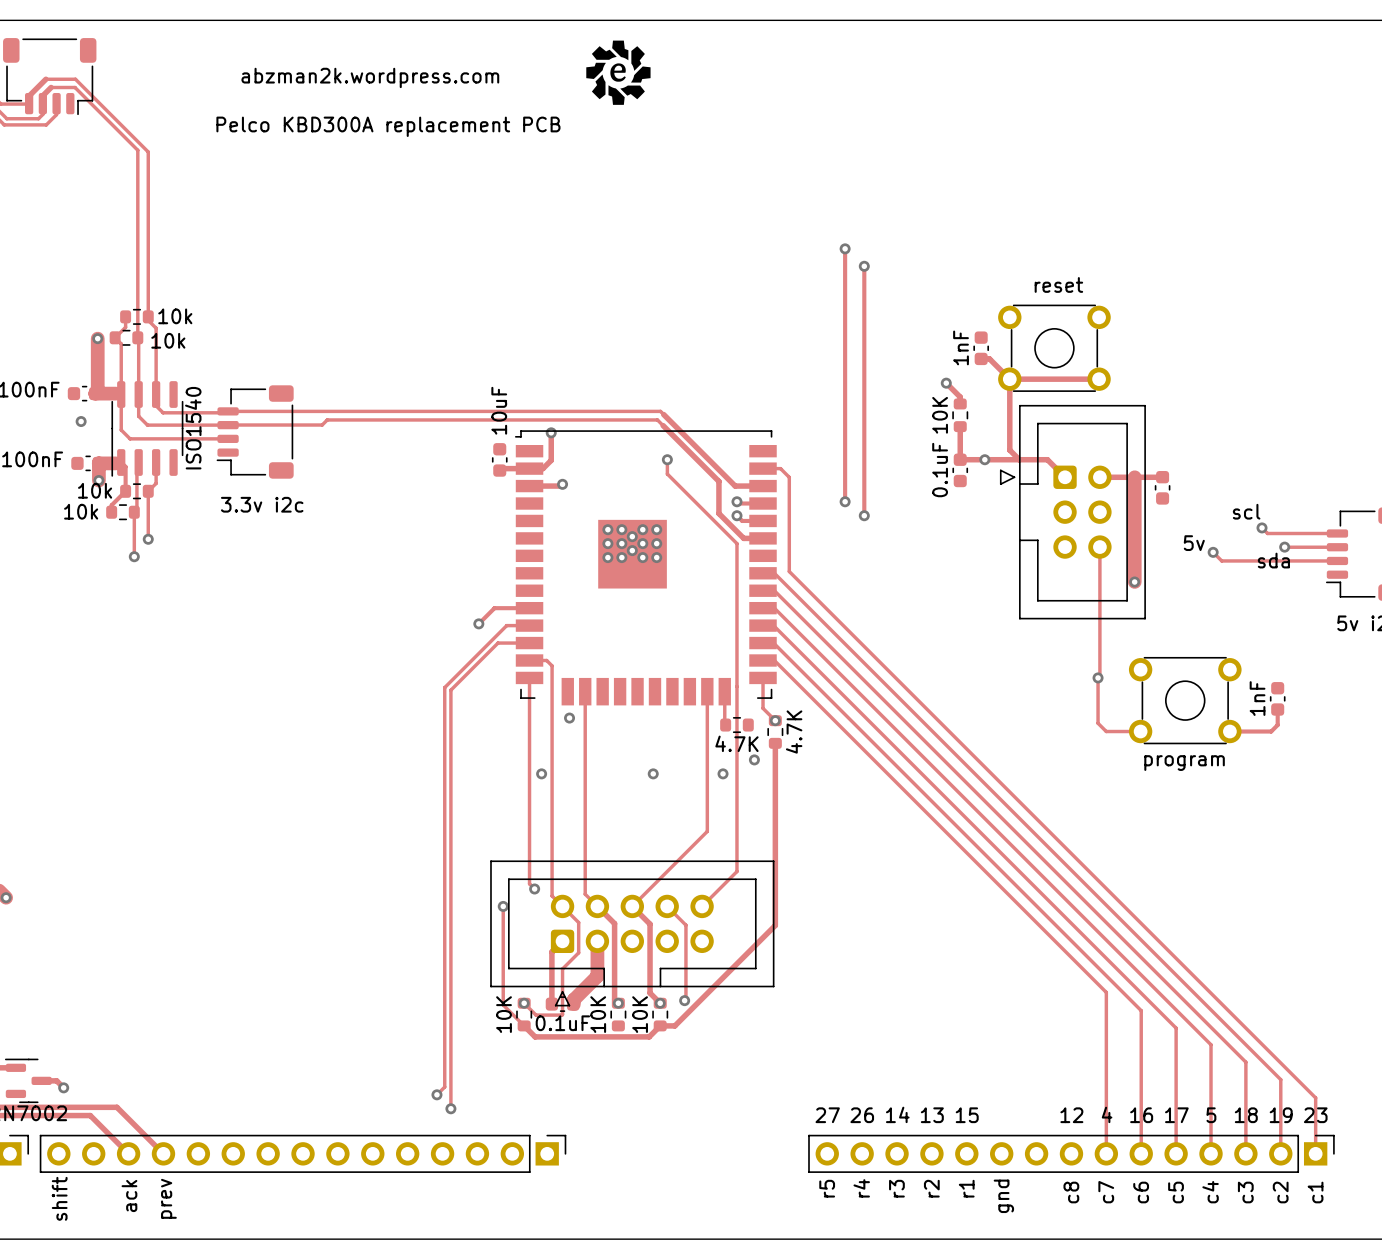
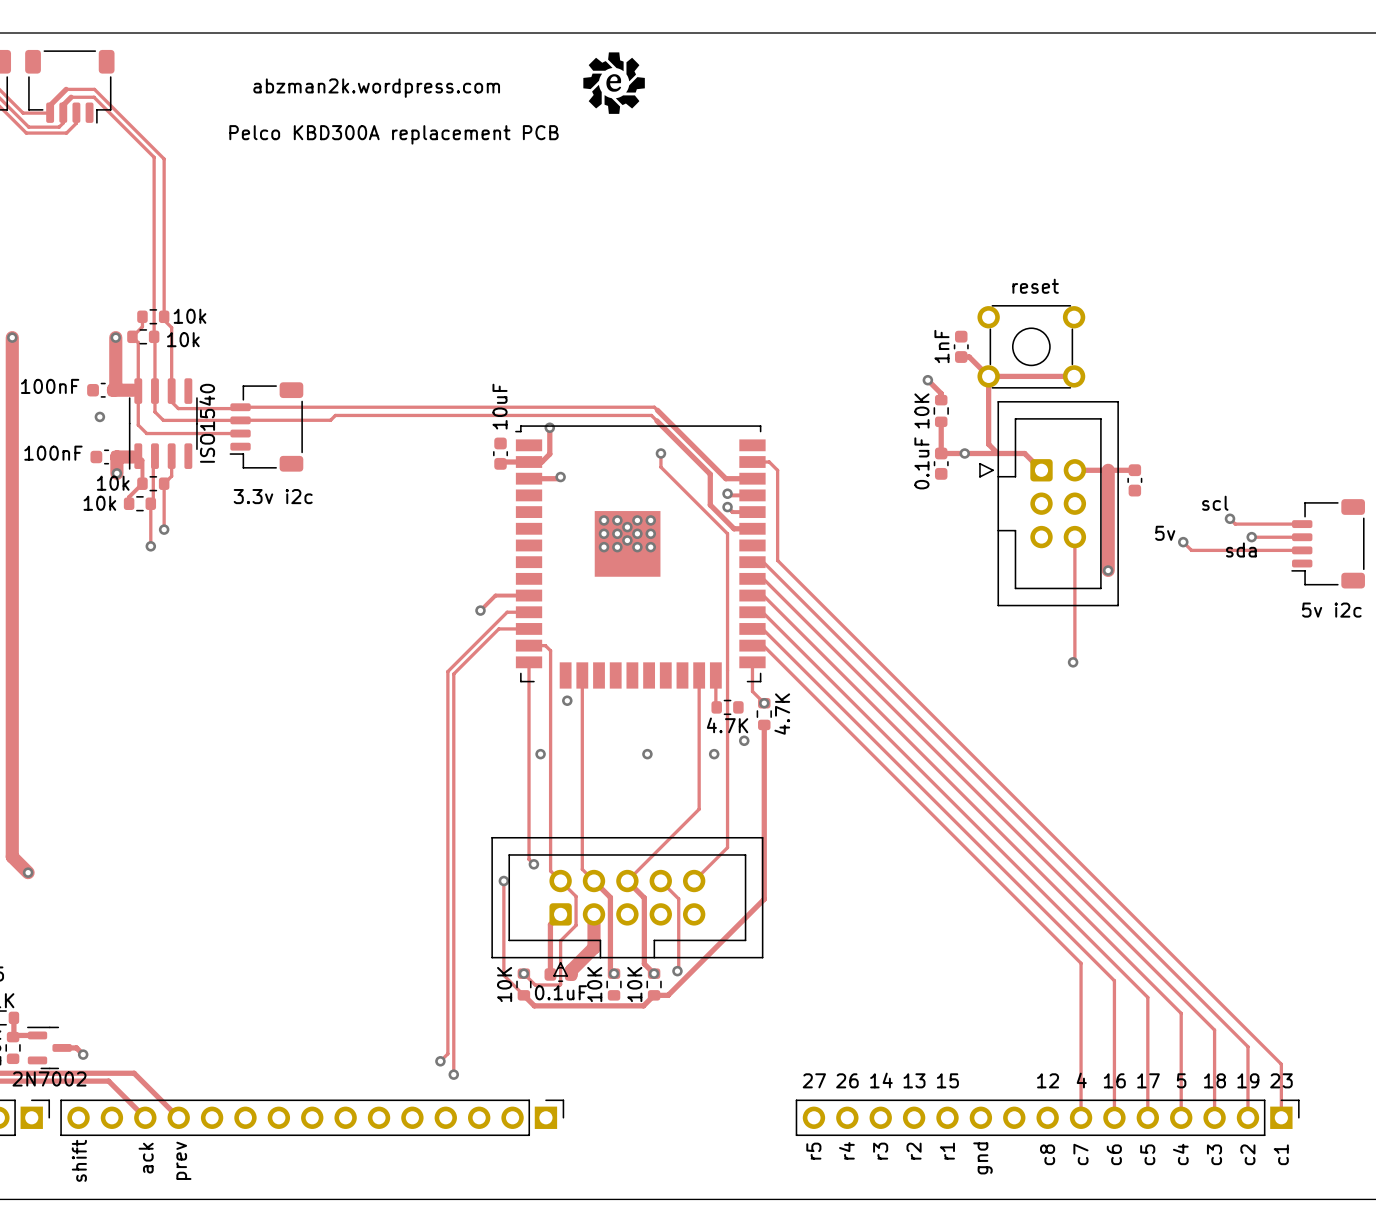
track: (845, 248) (845, 501) -> none
via: (845, 248) -> none
track: (864, 266) (864, 515) -> none
via: (864, 266) -> none
via: (845, 501) -> none
via: (864, 515) -> none
track: (1098, 677) (1098, 723) (1106, 731) (1140, 731) -> none
part: 1nF (1277, 698) -> none
part: program (1185, 700) -> none
track: (1277, 709) (1277, 725) (1271, 731) (1229, 731) -> none

